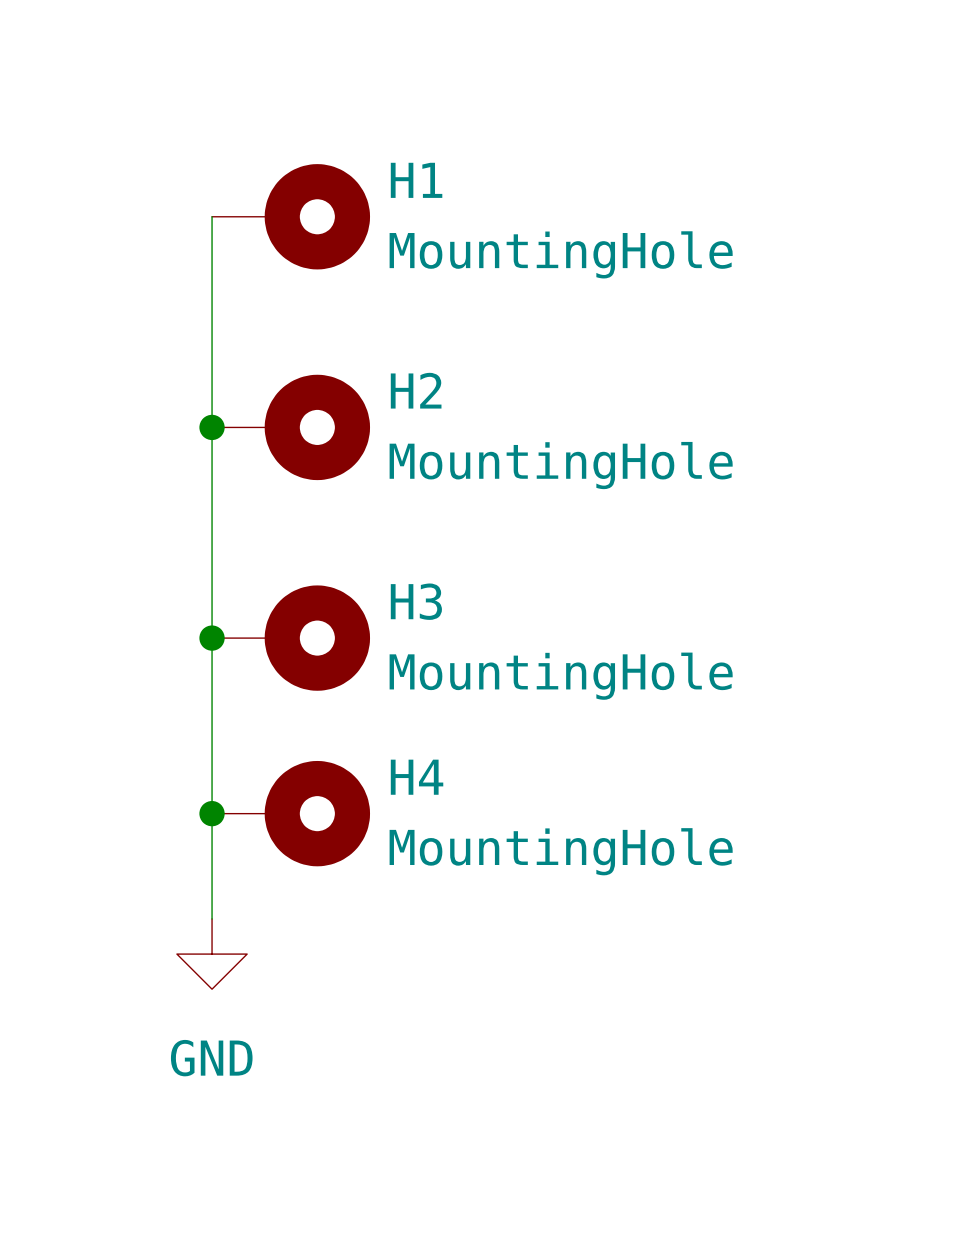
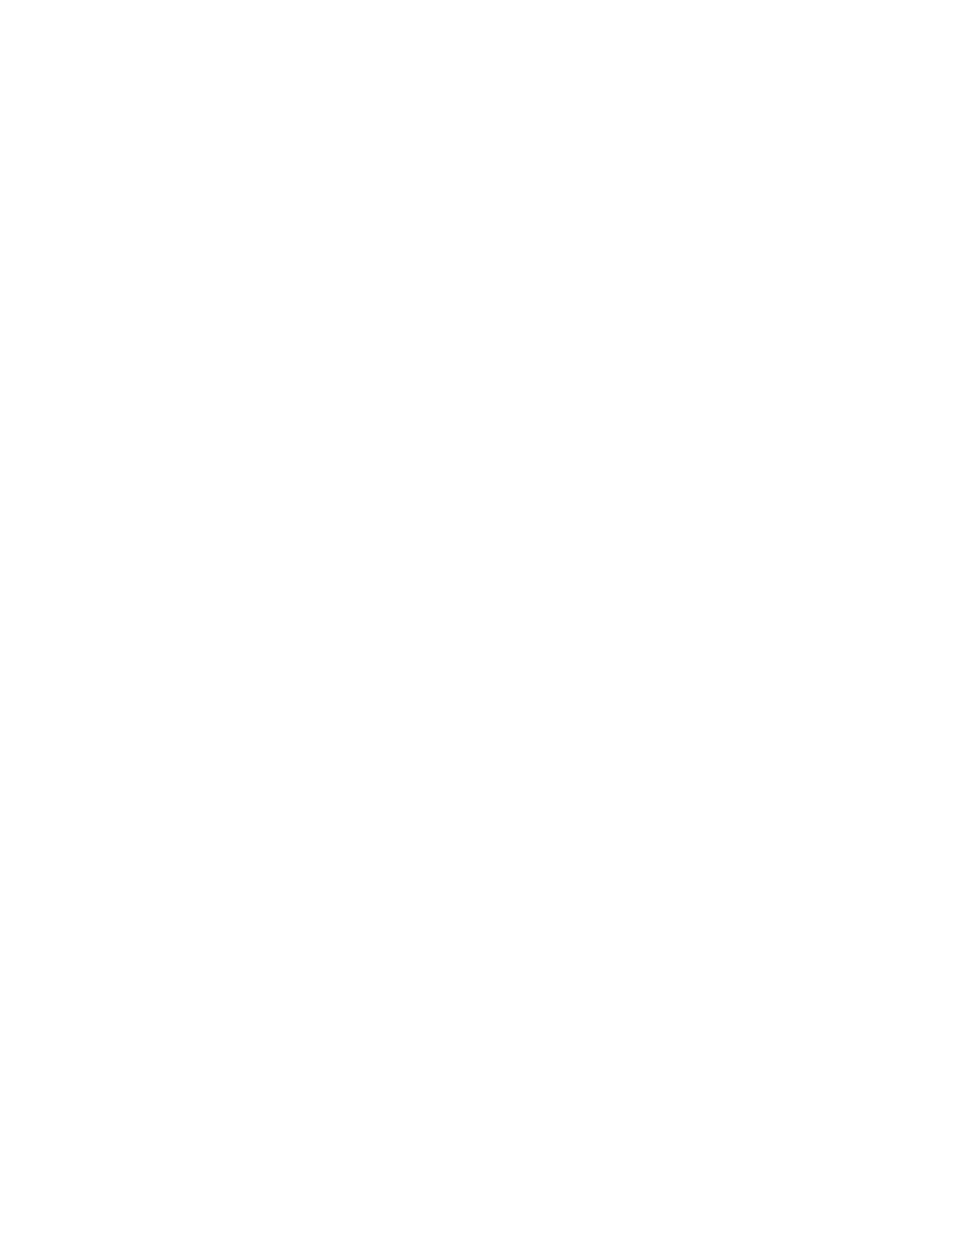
wire: (212, 216) (212, 918) -> none
H1: MountingHole (291, 216) -> none
junction: (212, 427) -> none
H2: MountingHole (291, 427) -> none
junction: (212, 638) -> none
H3: MountingHole (291, 638) -> none
junction: (212, 813) -> none
H4: MountingHole (291, 813) -> none
power symbol: GND (212, 954) -> none

